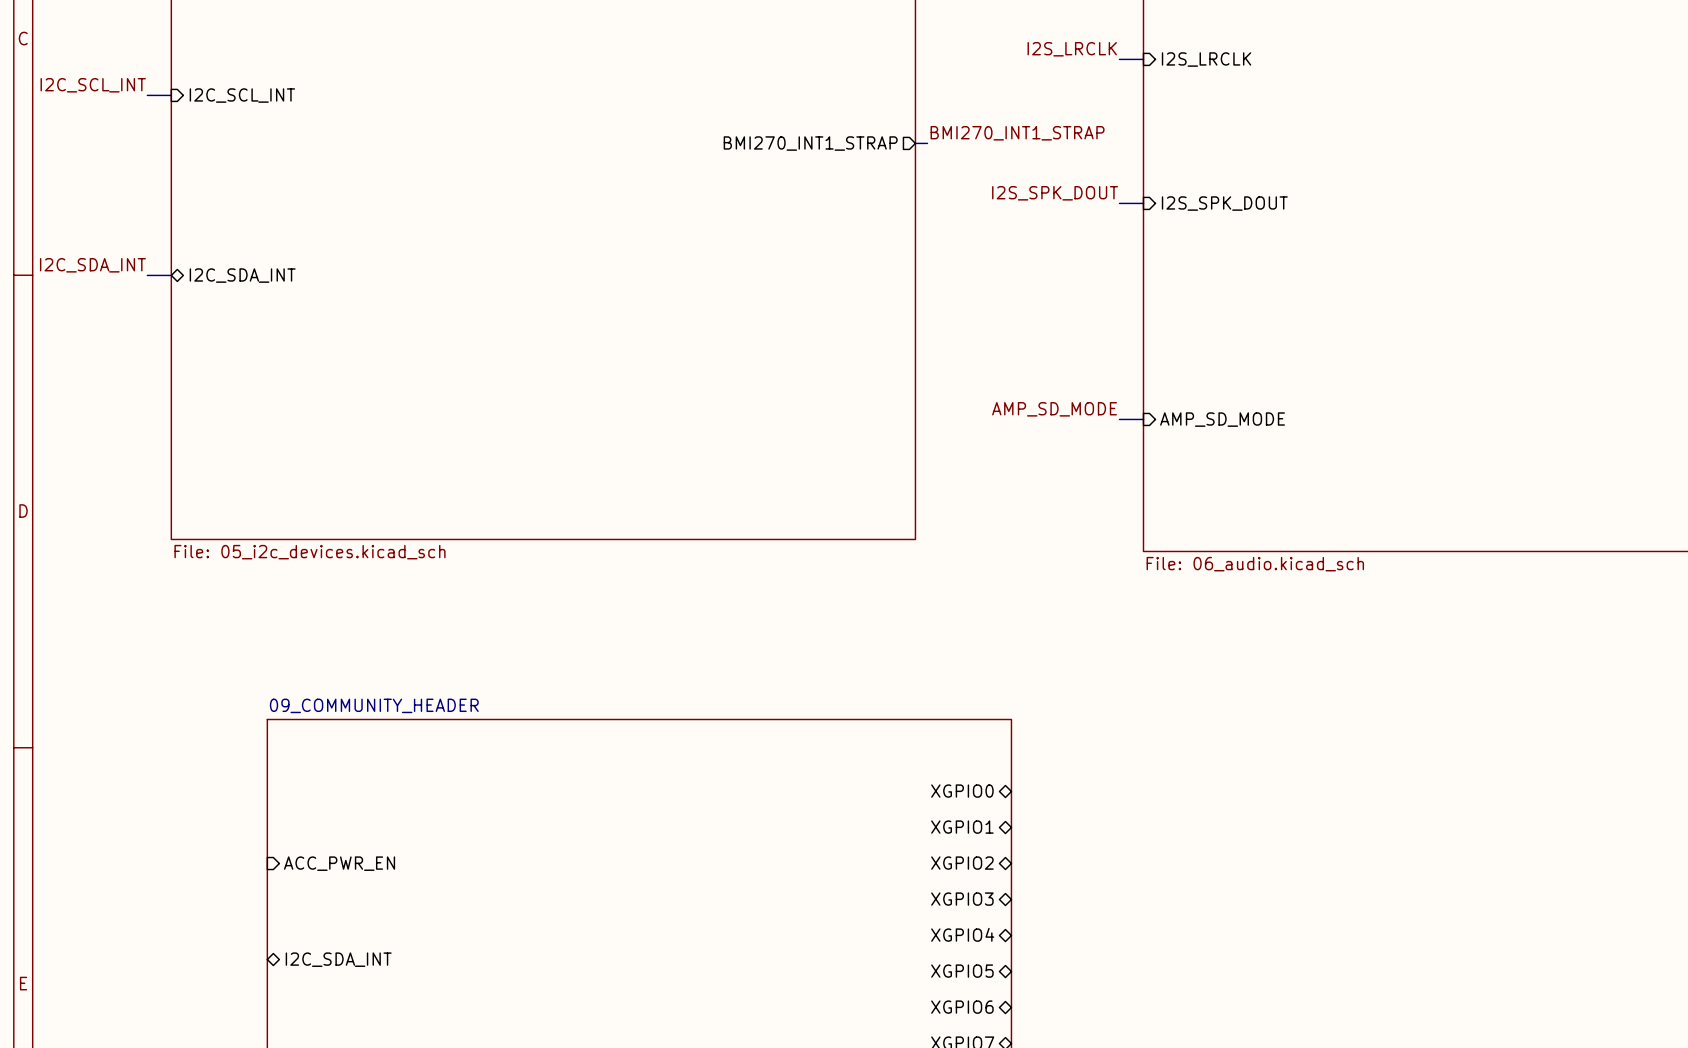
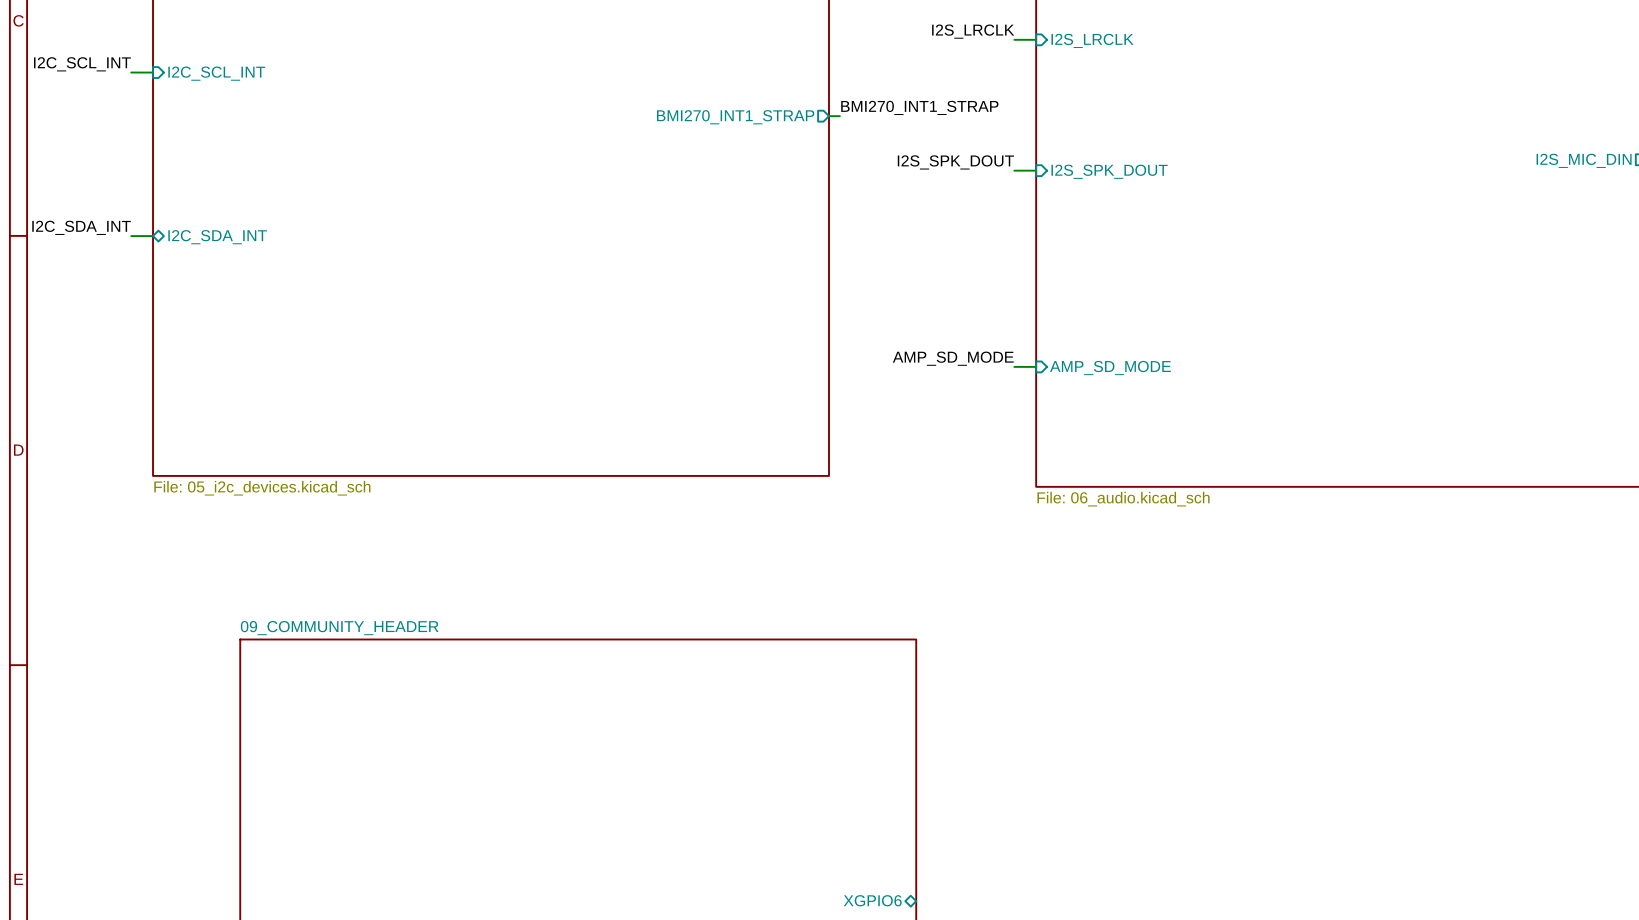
sheet pin: XGPIO0 (962, 791) -> none
sheet pin: XGPIO1 (962, 827) -> none
sheet pin: ACC_PWR_EN (339, 863) -> none
sheet pin: XGPIO2 (962, 863) -> none
sheet pin: XGPIO3 (962, 899) -> none
sheet pin: XGPIO4 (962, 934) -> none
sheet pin: I2C_SDA_INT (338, 959) -> none
sheet pin: XGPIO5 (962, 971) -> none

